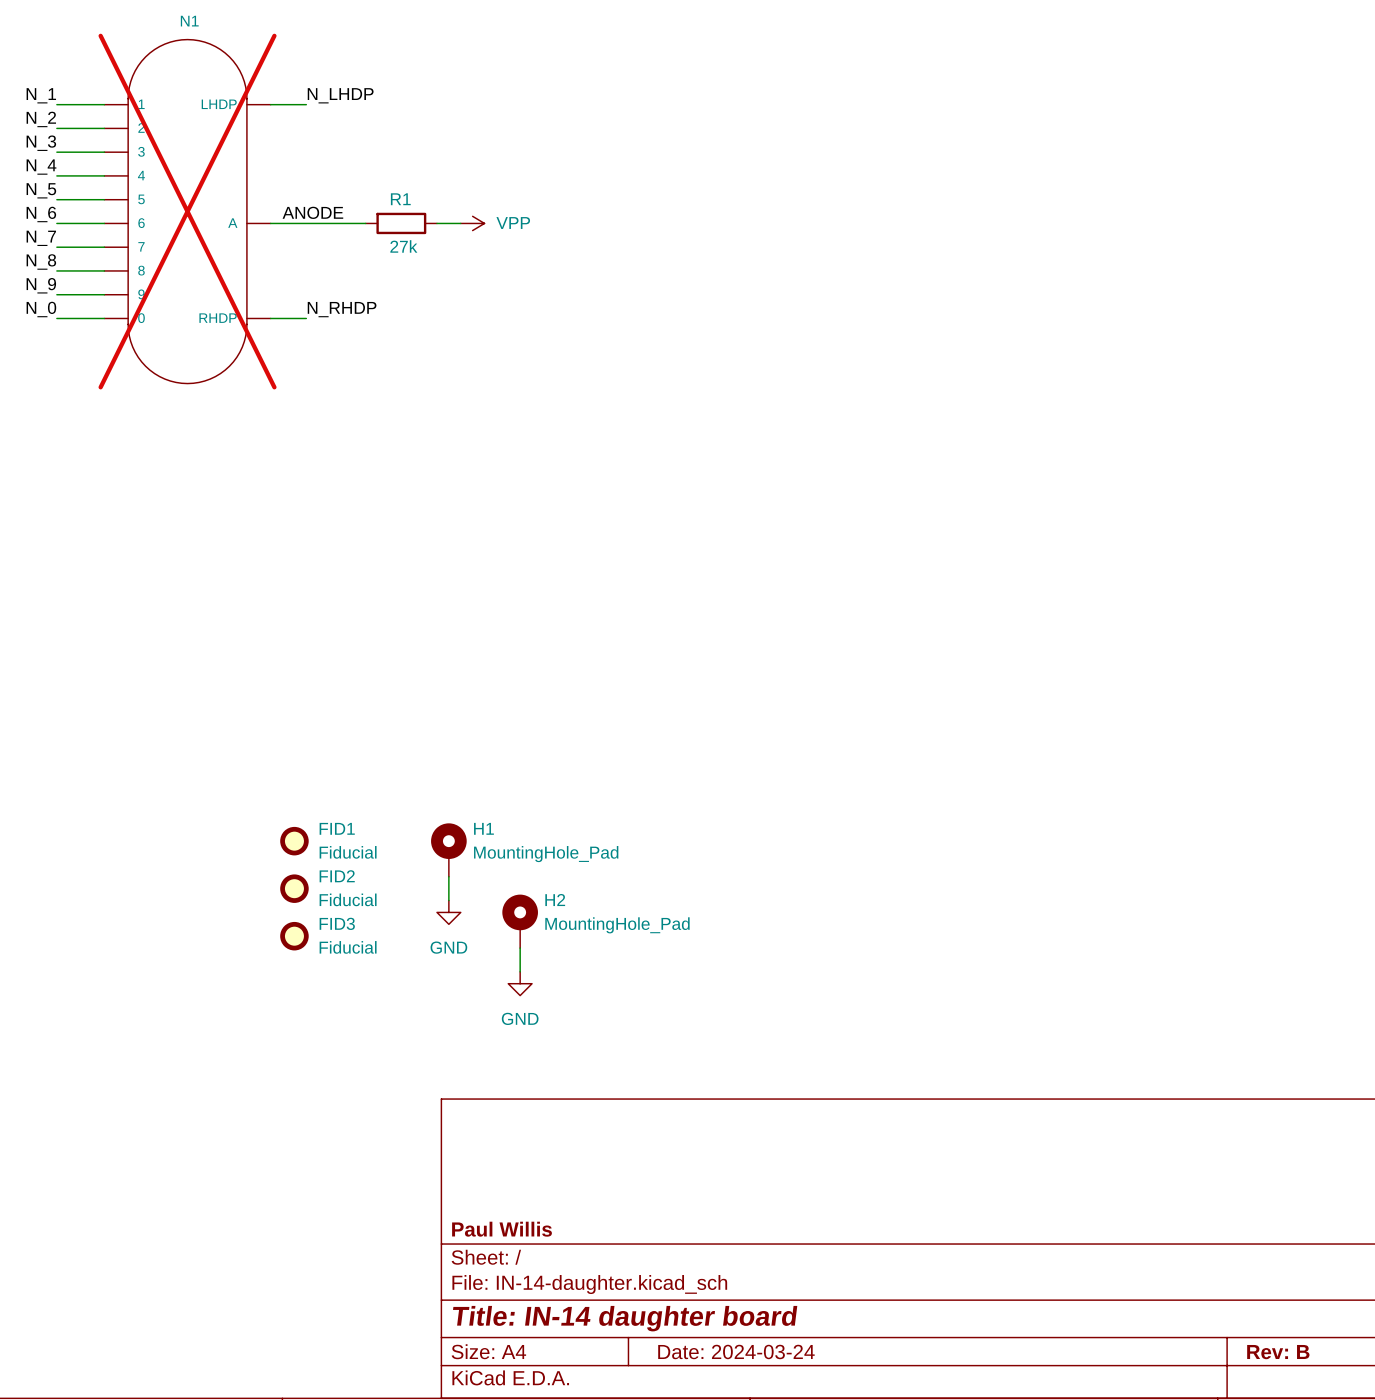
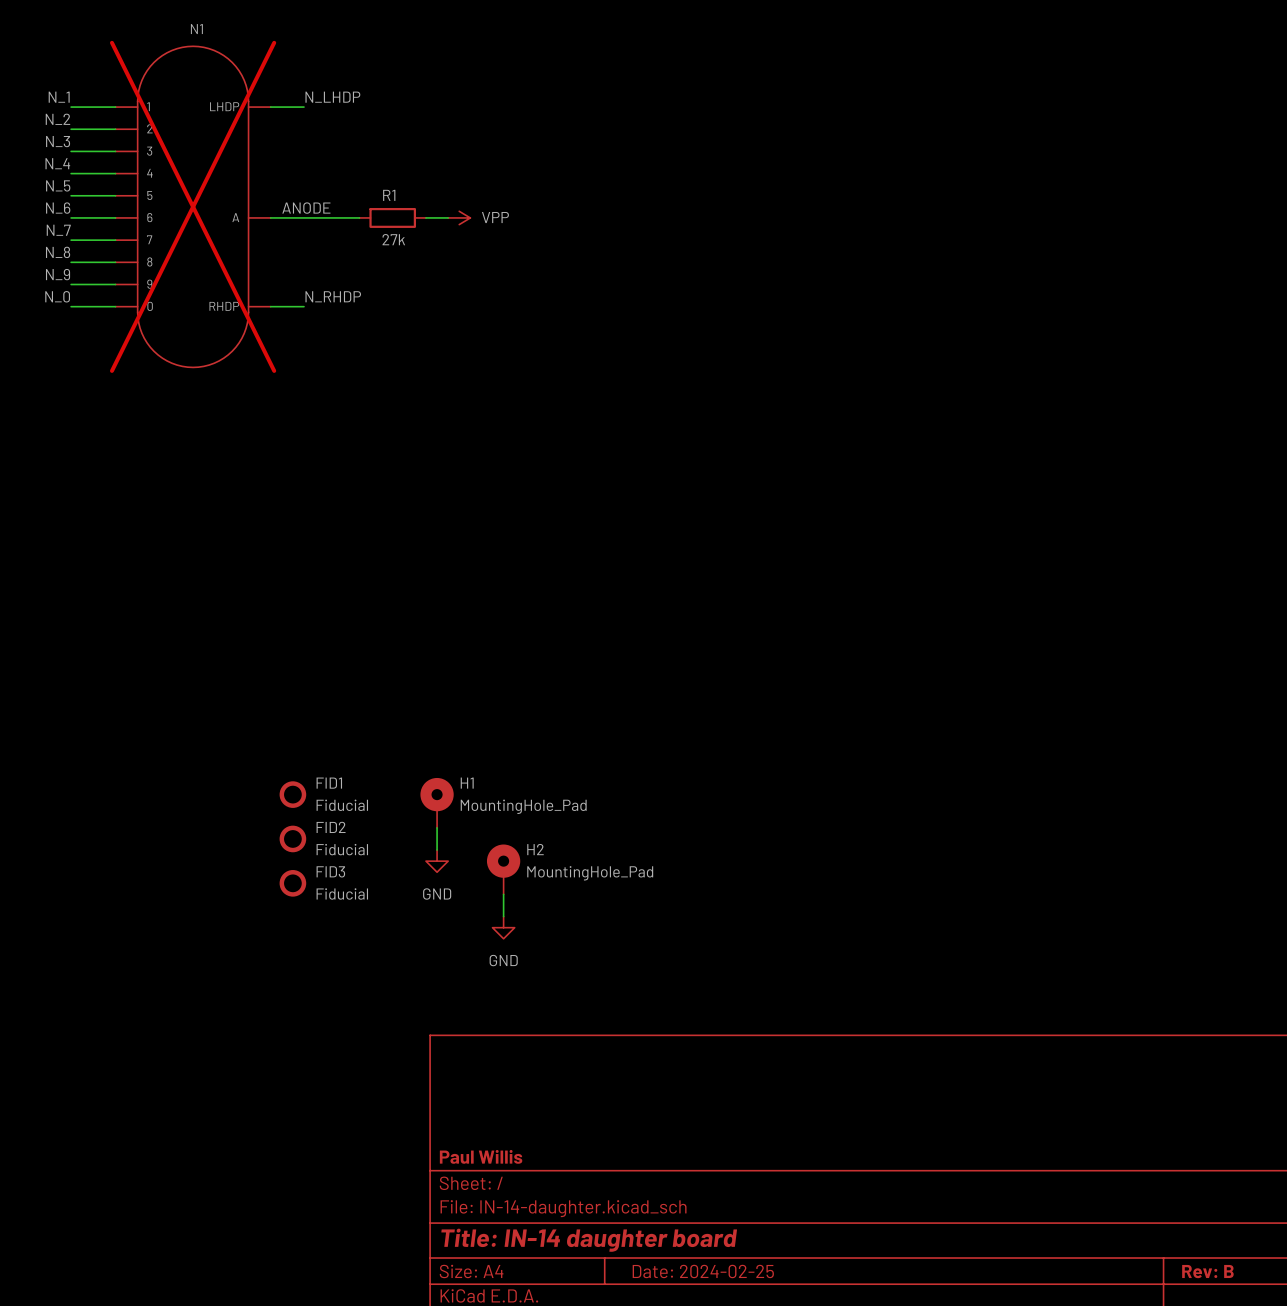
title block: Date: 2024-03-24 (736, 1351) -> Date: 2024-02-25 (703, 1271)

